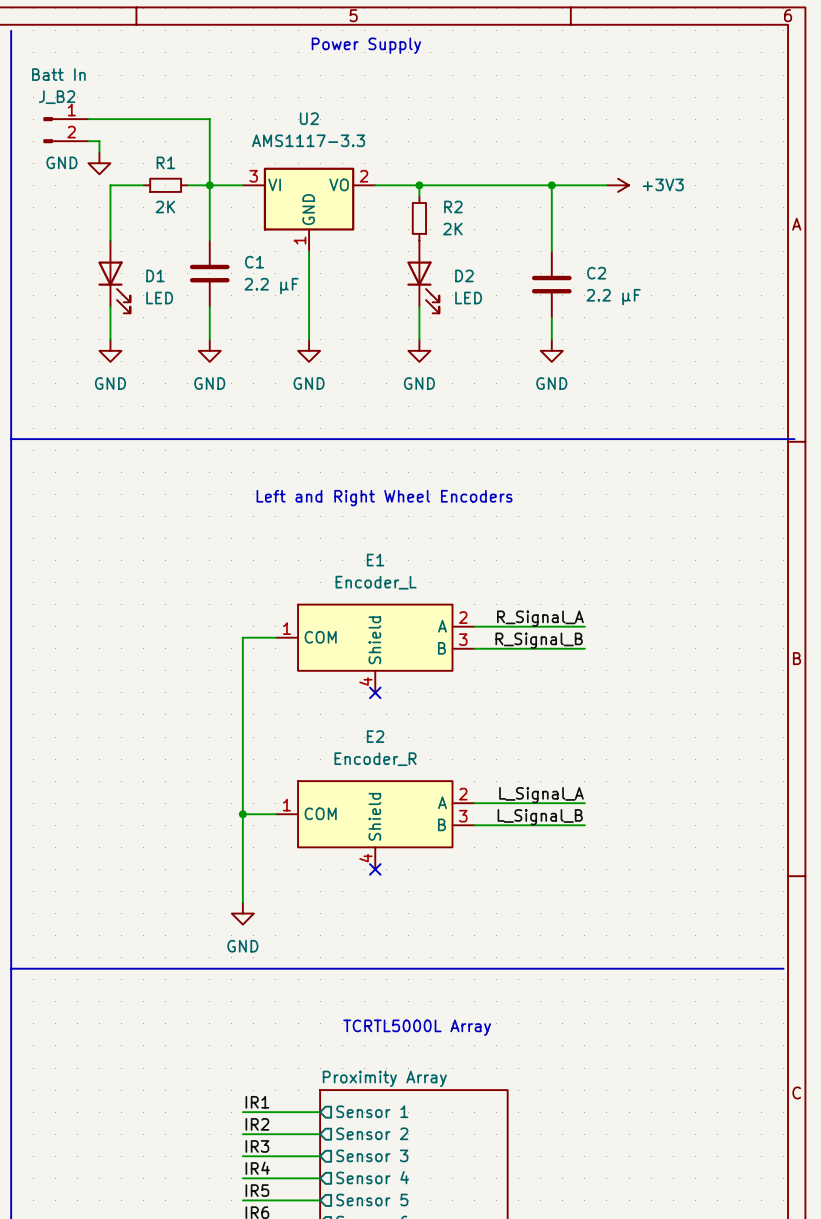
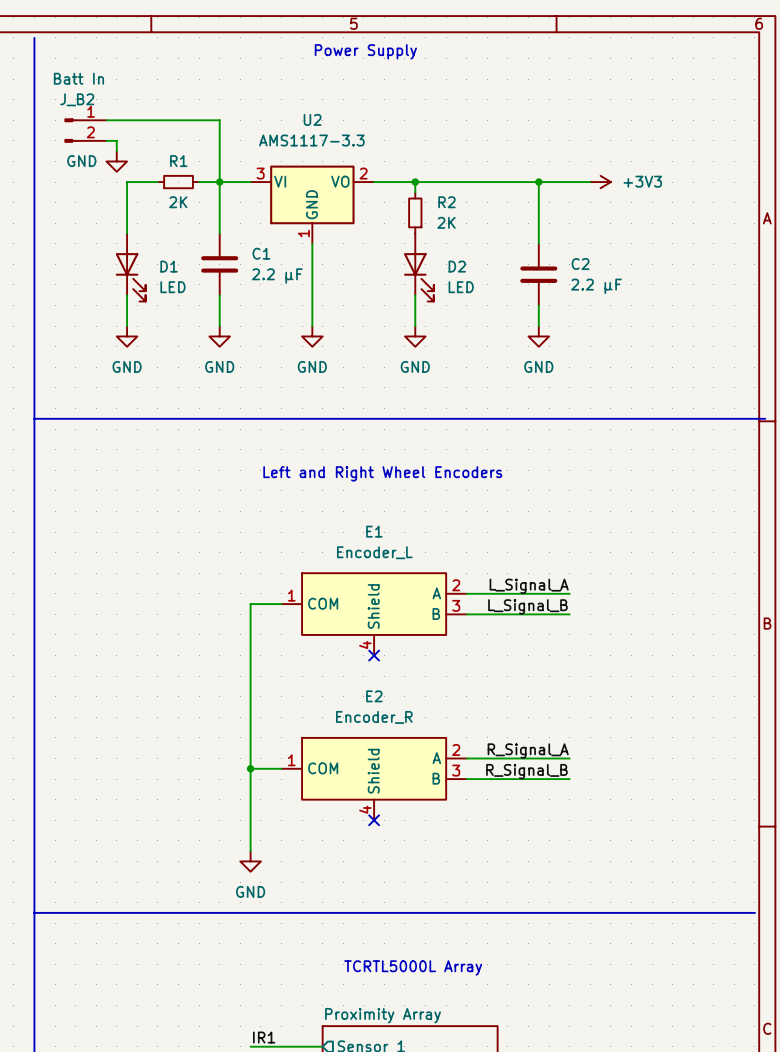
label: R_Signal_A (540, 618) -> L_Signal_A (529, 586)
label: R_Signal_B (539, 640) -> L_Signal_B (527, 606)
label: L_Signal_A (541, 795) -> R_Signal_A (528, 751)
label: L_Signal_B (540, 817) -> R_Signal_B (526, 771)

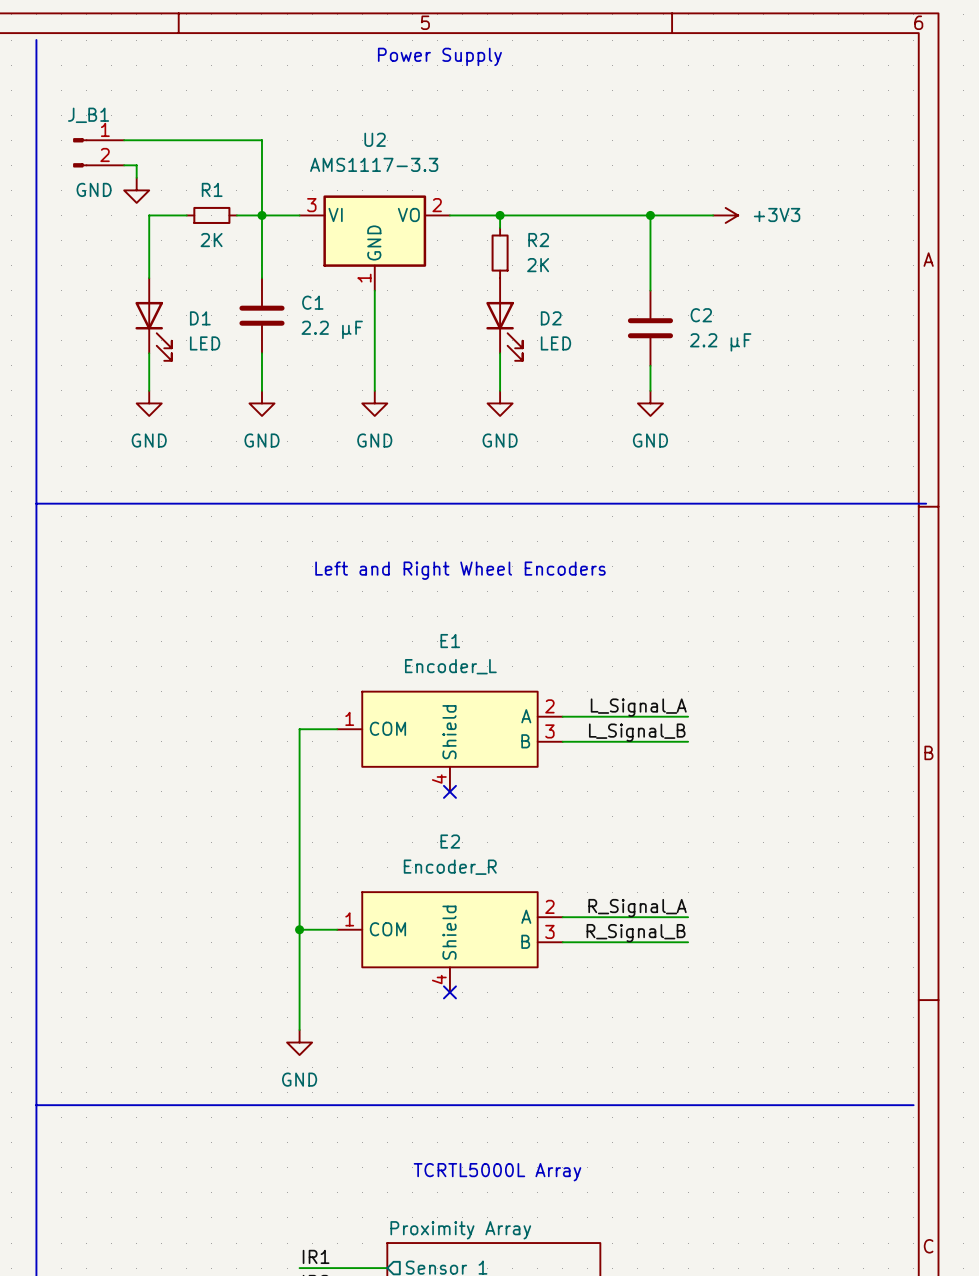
J_B2 value: Batt In (78, 78) -> none
J_B2 name: J_B2 (77, 99) -> J_B1 (88, 115)

